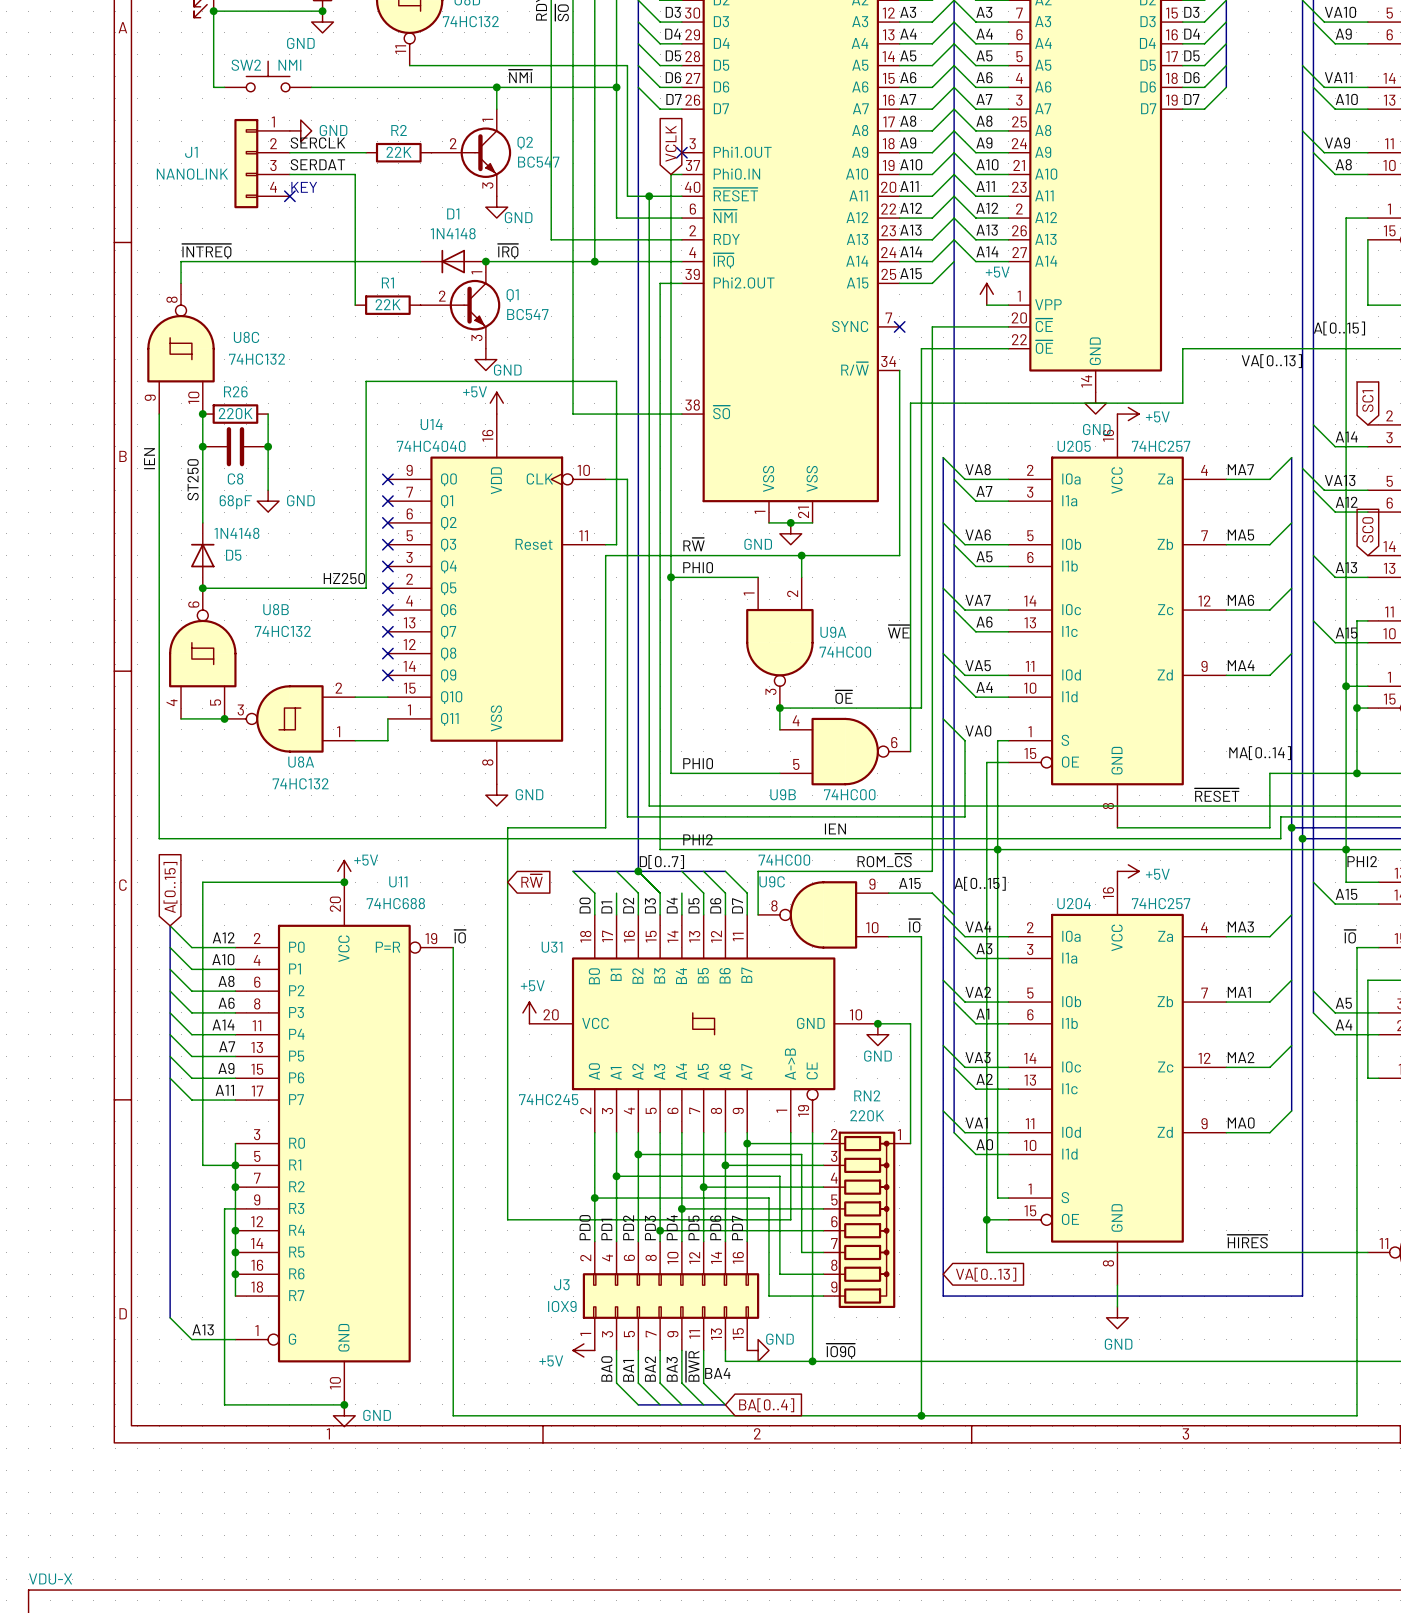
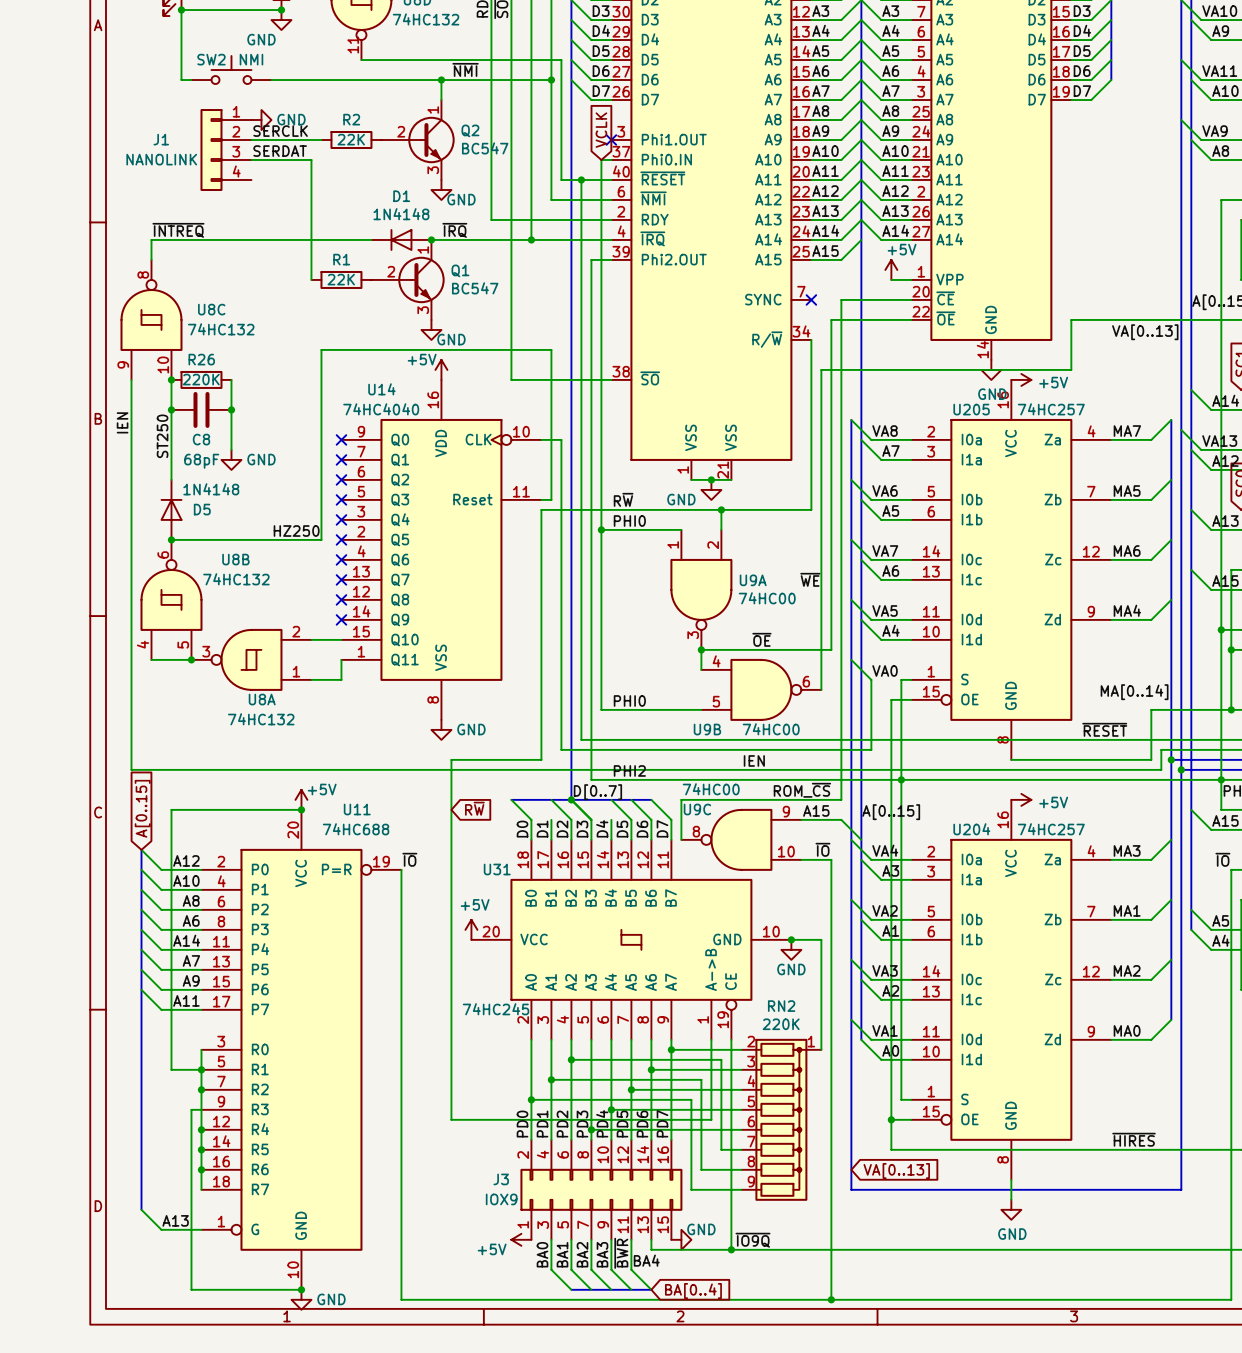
text: KEY (304, 187) -> none
no-connect mark: (289, 196) -> none

